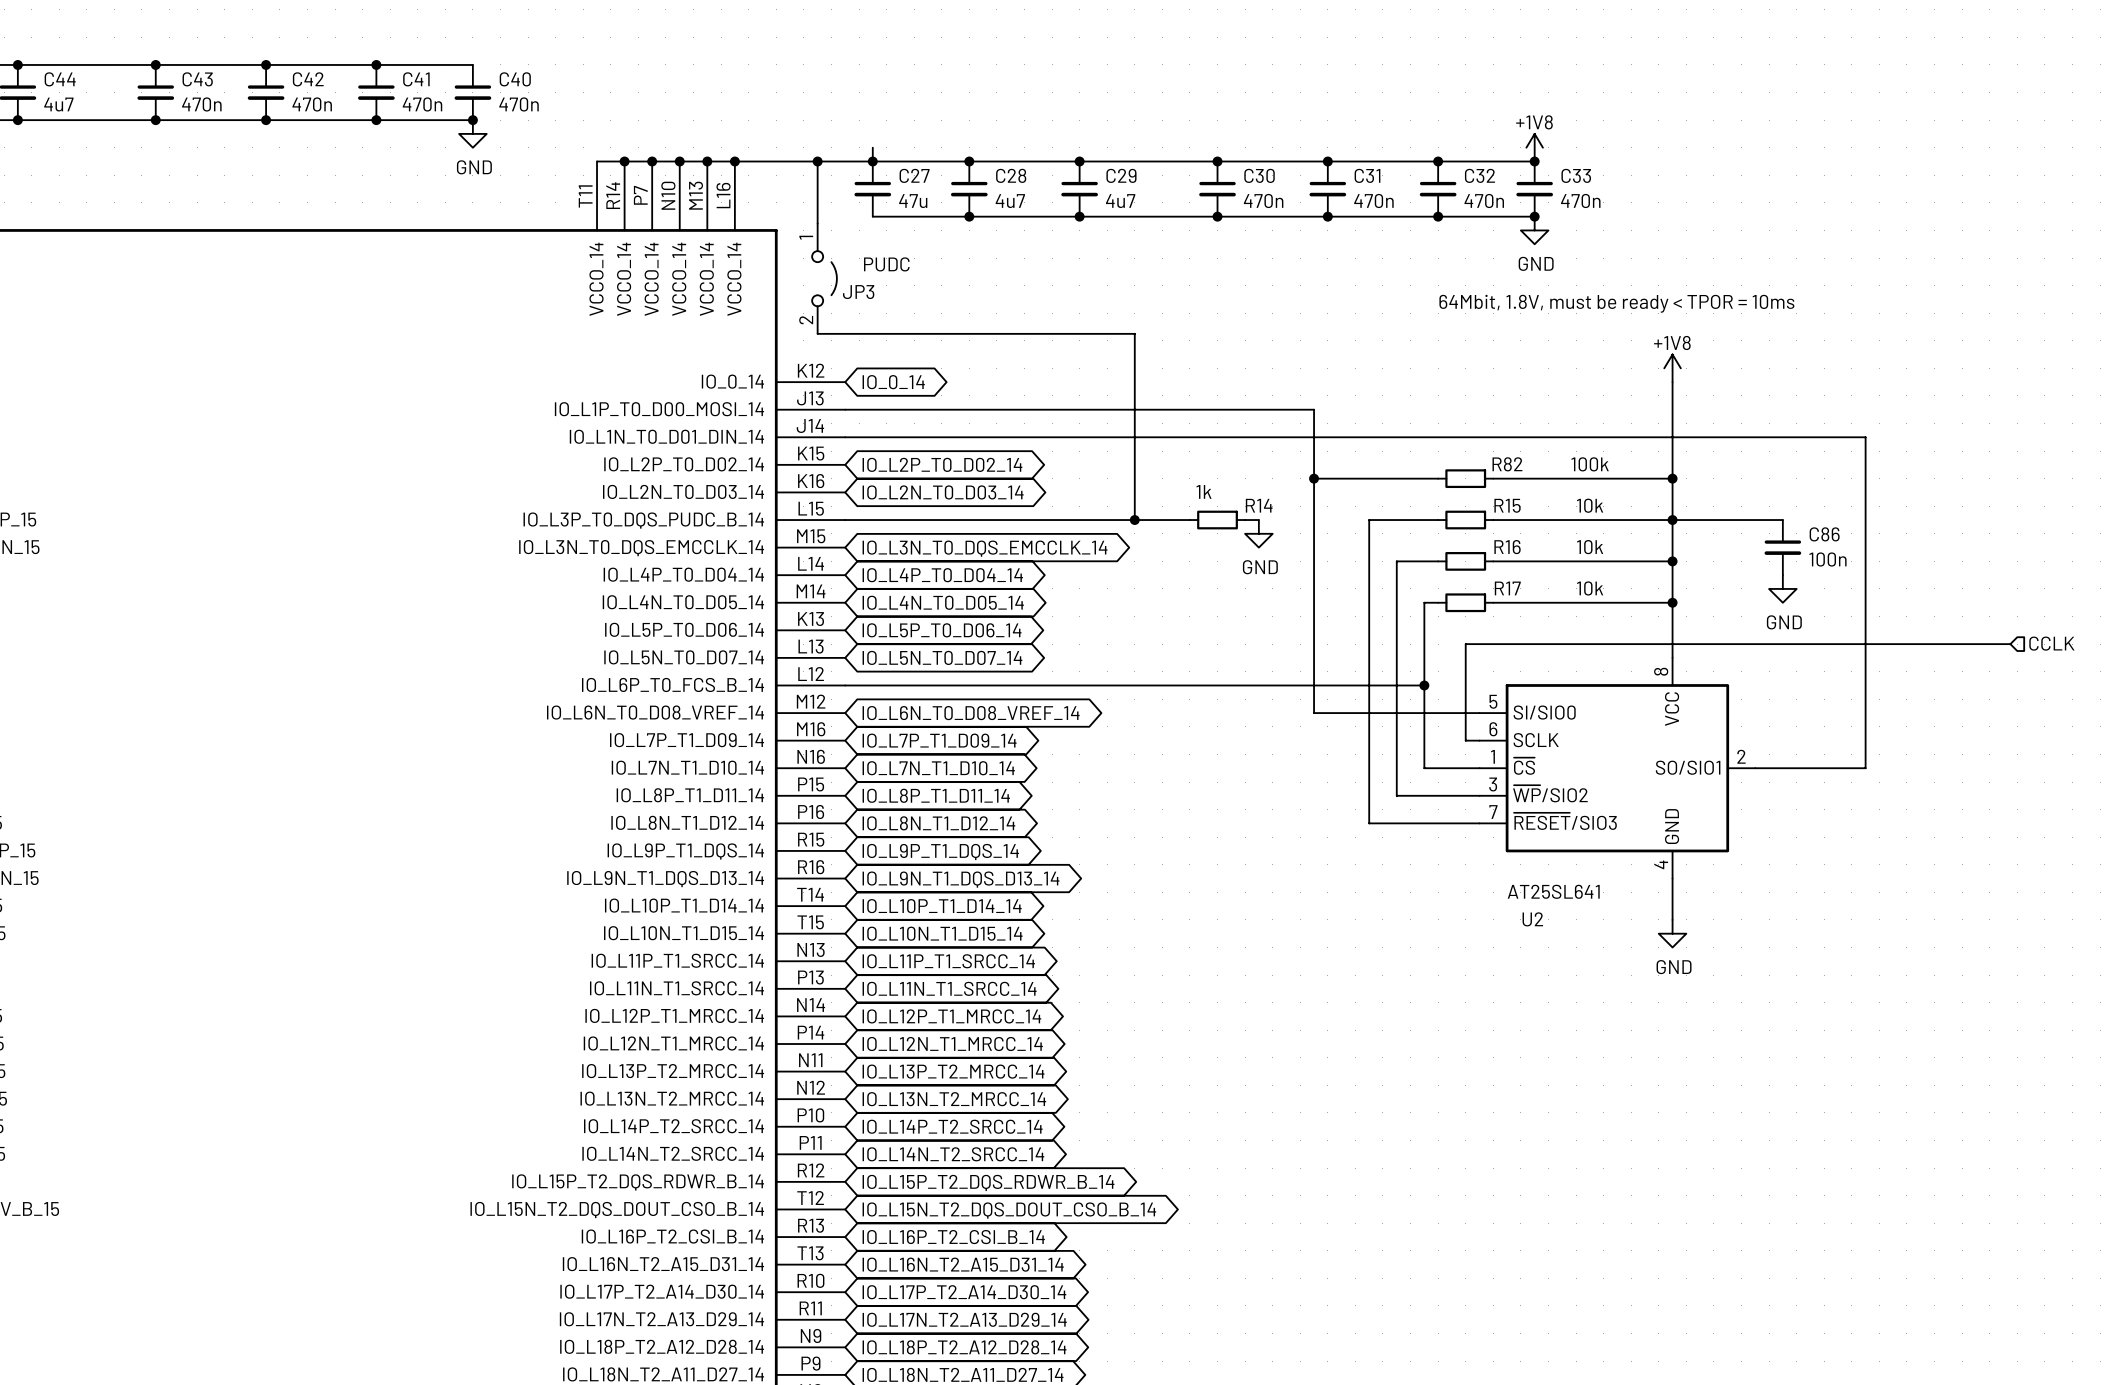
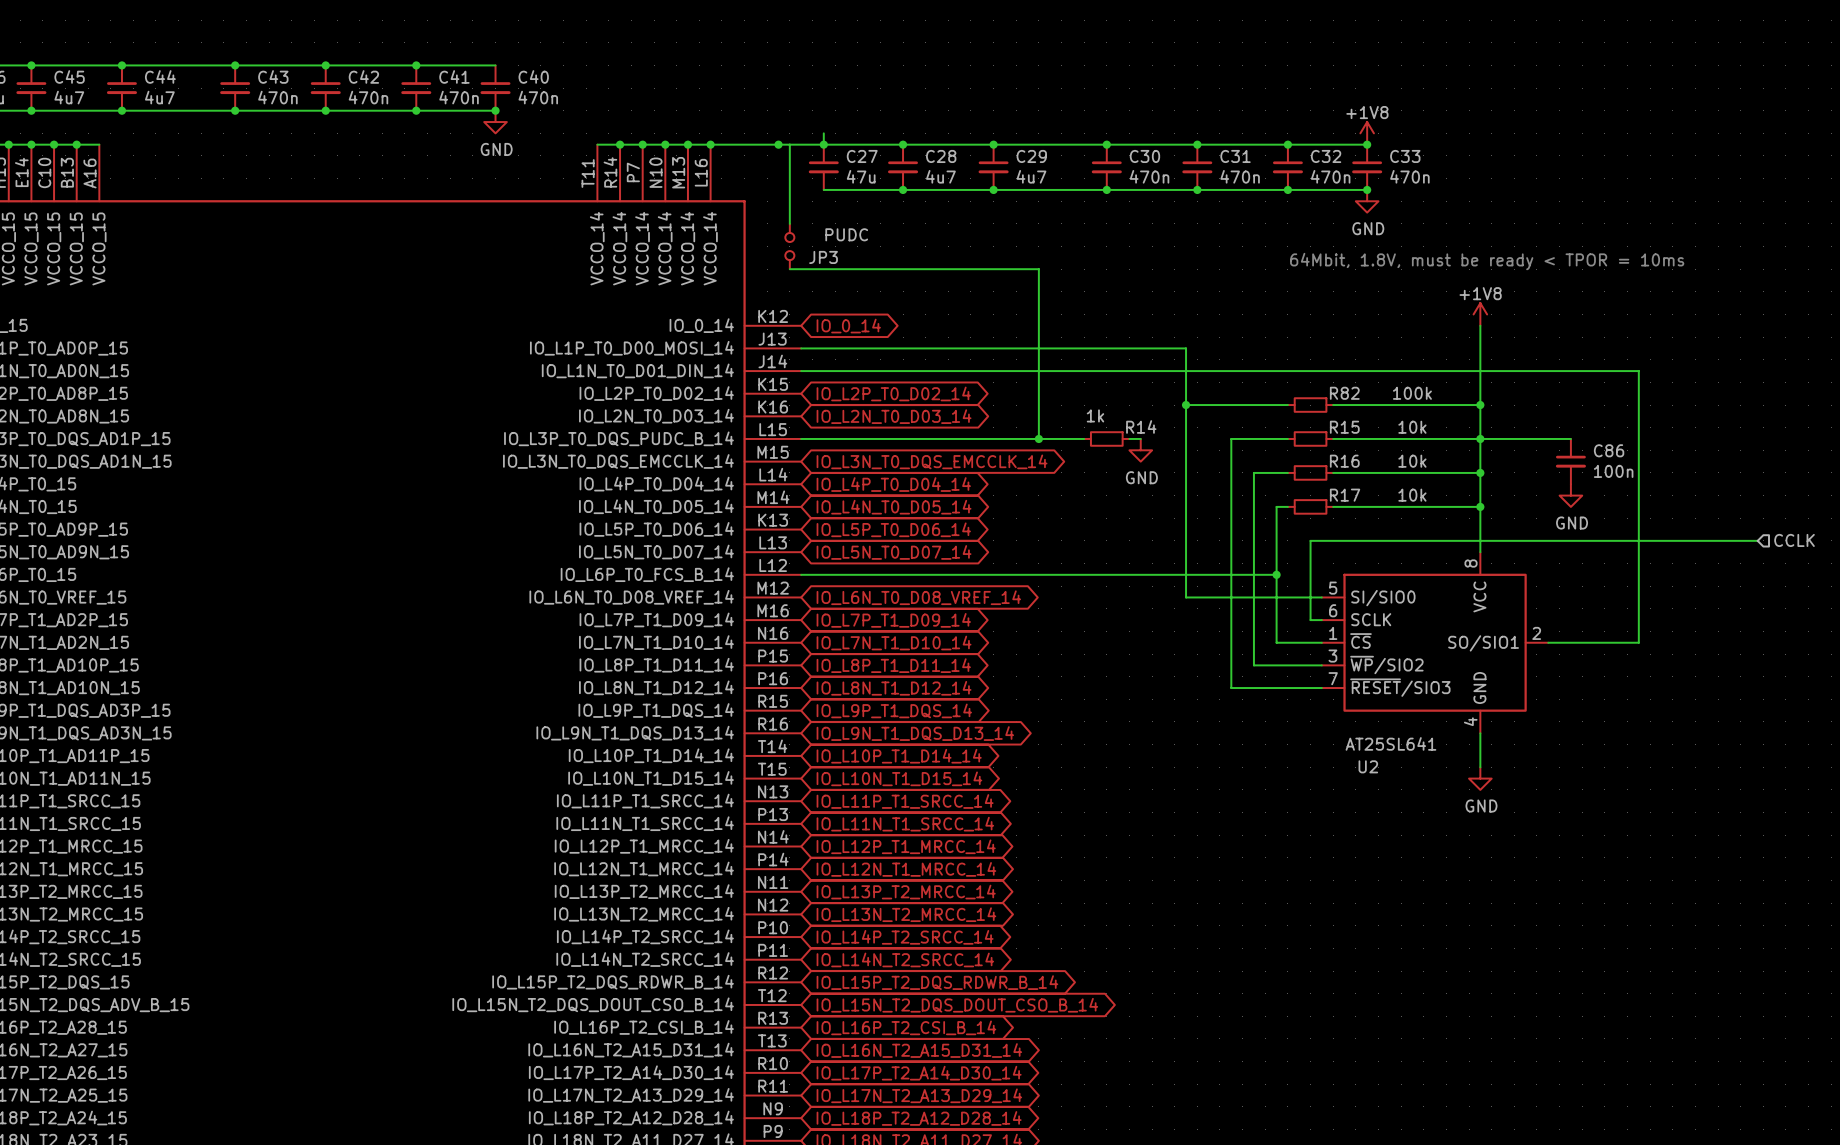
wire: (817, 161) (817, 223) -> none
wire: none -> (789, 144) (789, 223)
JP3 symbol: [812, 223, 837, 334] -> [785, 223, 795, 270]
wire: (817, 333) (1134, 333) -> (789, 269) (1038, 269) (1038, 286)

